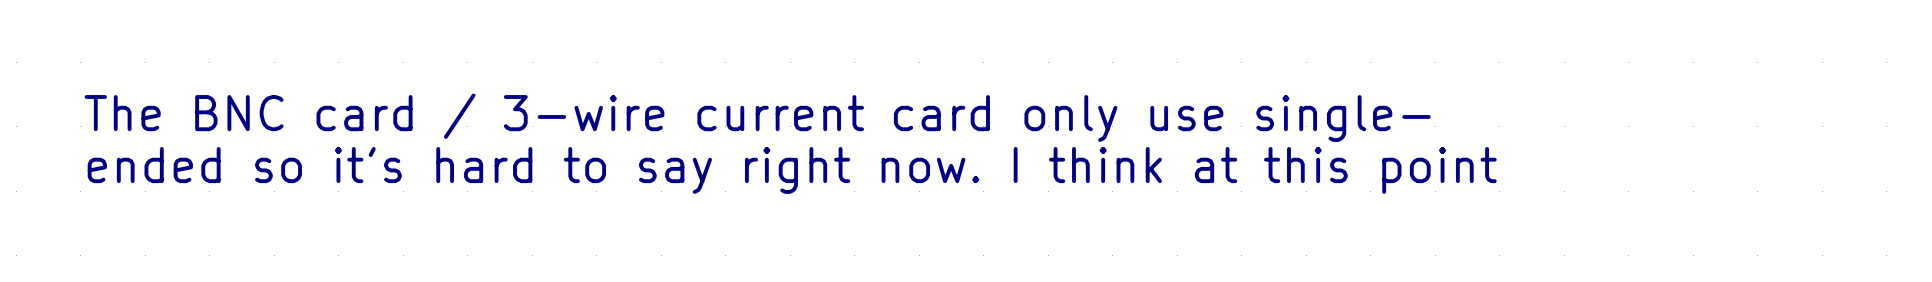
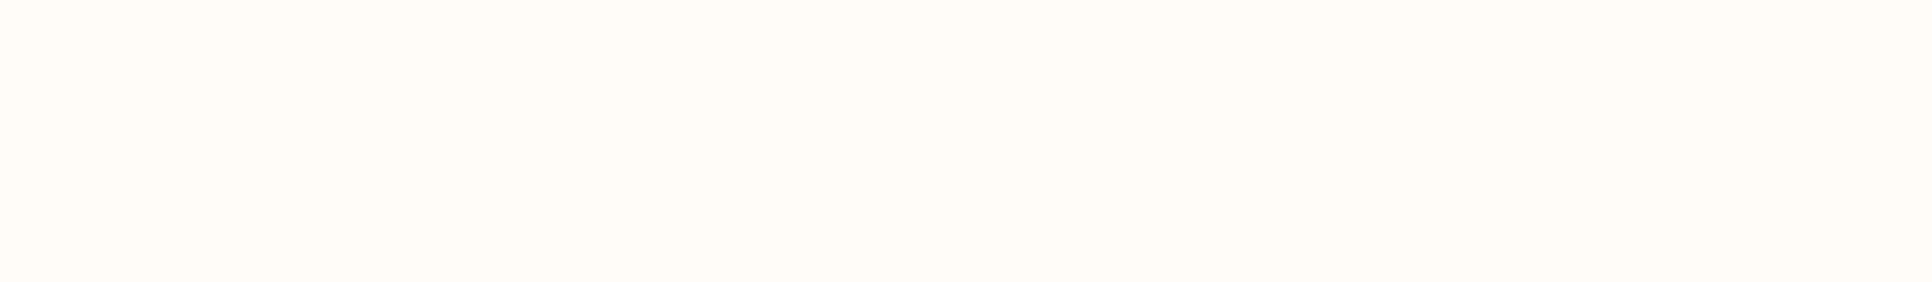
text: The BNC card / 3-wire current card only use single- (757, 117) -> none
text: ended so it's hard to say right now. I think at this point (792, 170) -> none

